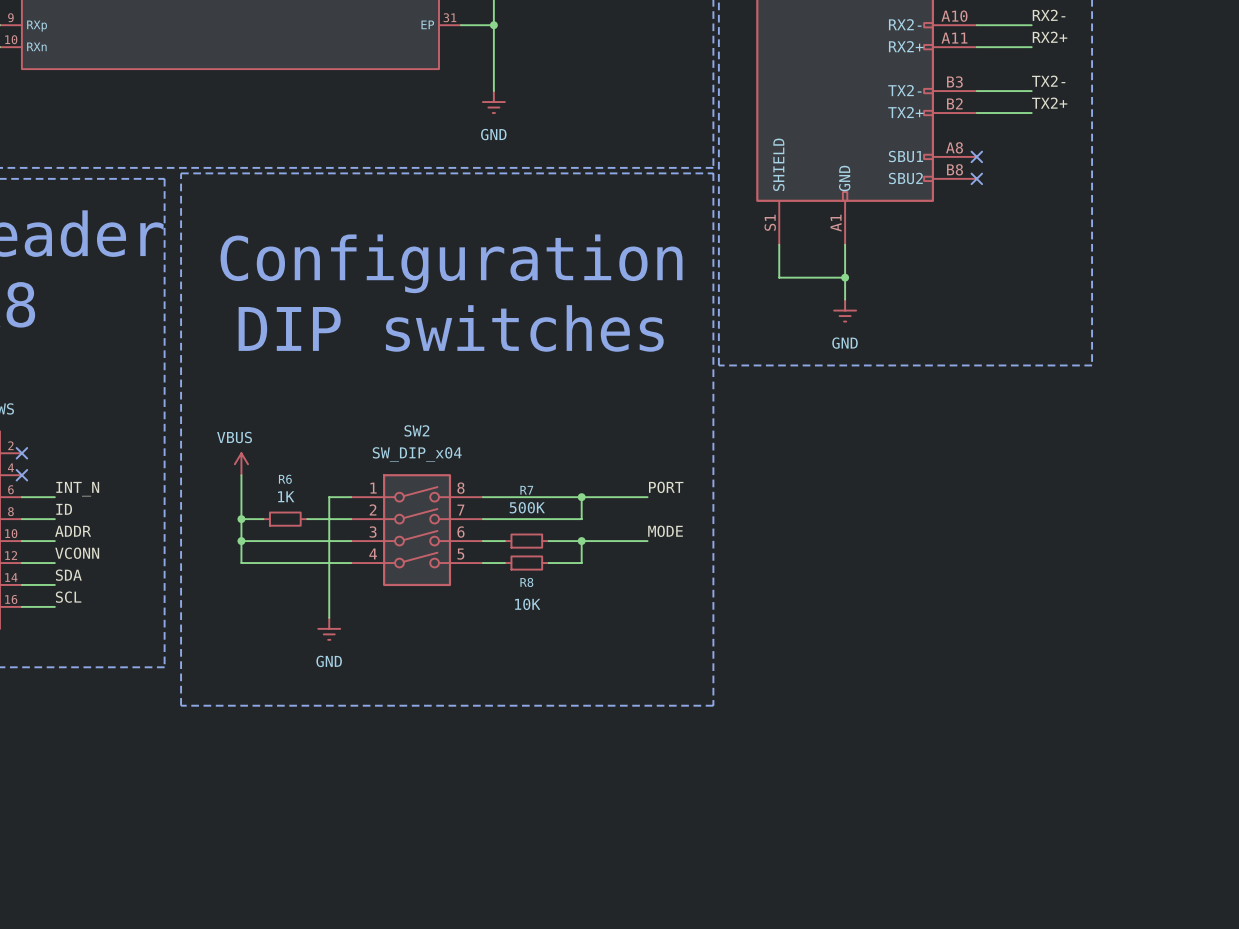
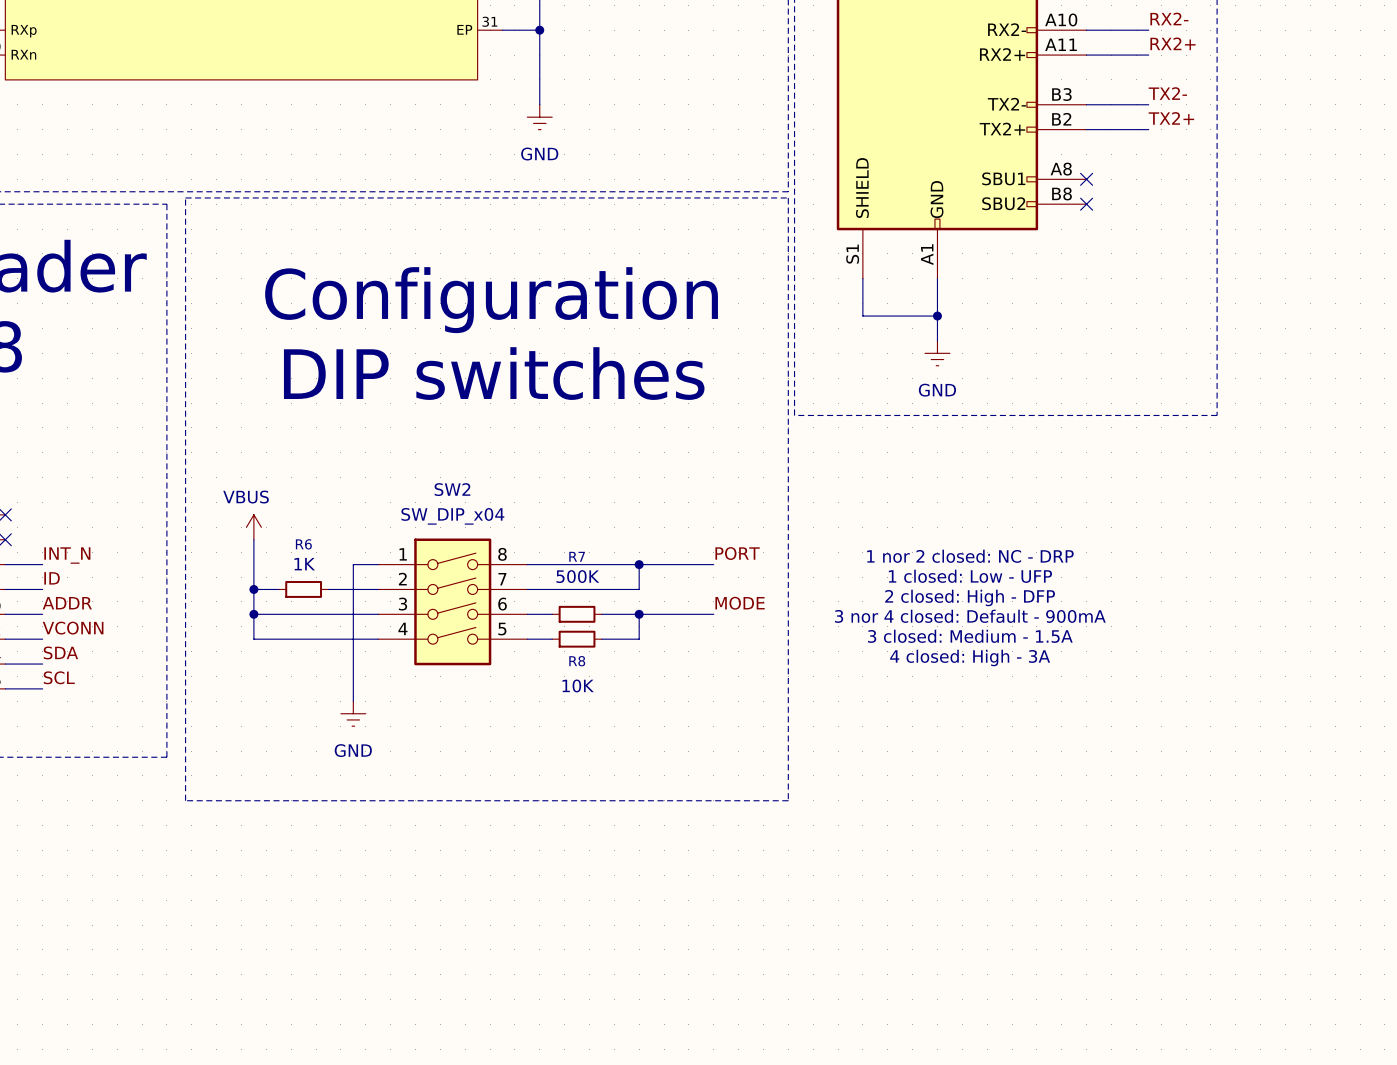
text: none -> 1 nor 2 closed: NC - DRP (970, 556)
text: none -> 1 closed: Low - UFP (970, 576)
text: none -> 2 closed: High - DFP (970, 597)
text: none -> 3 nor 4 closed: Default - 900mA (970, 616)
text: none -> 3 closed: Medium - 1.5A (970, 636)
text: none -> 4 closed: High - 3A (970, 657)

